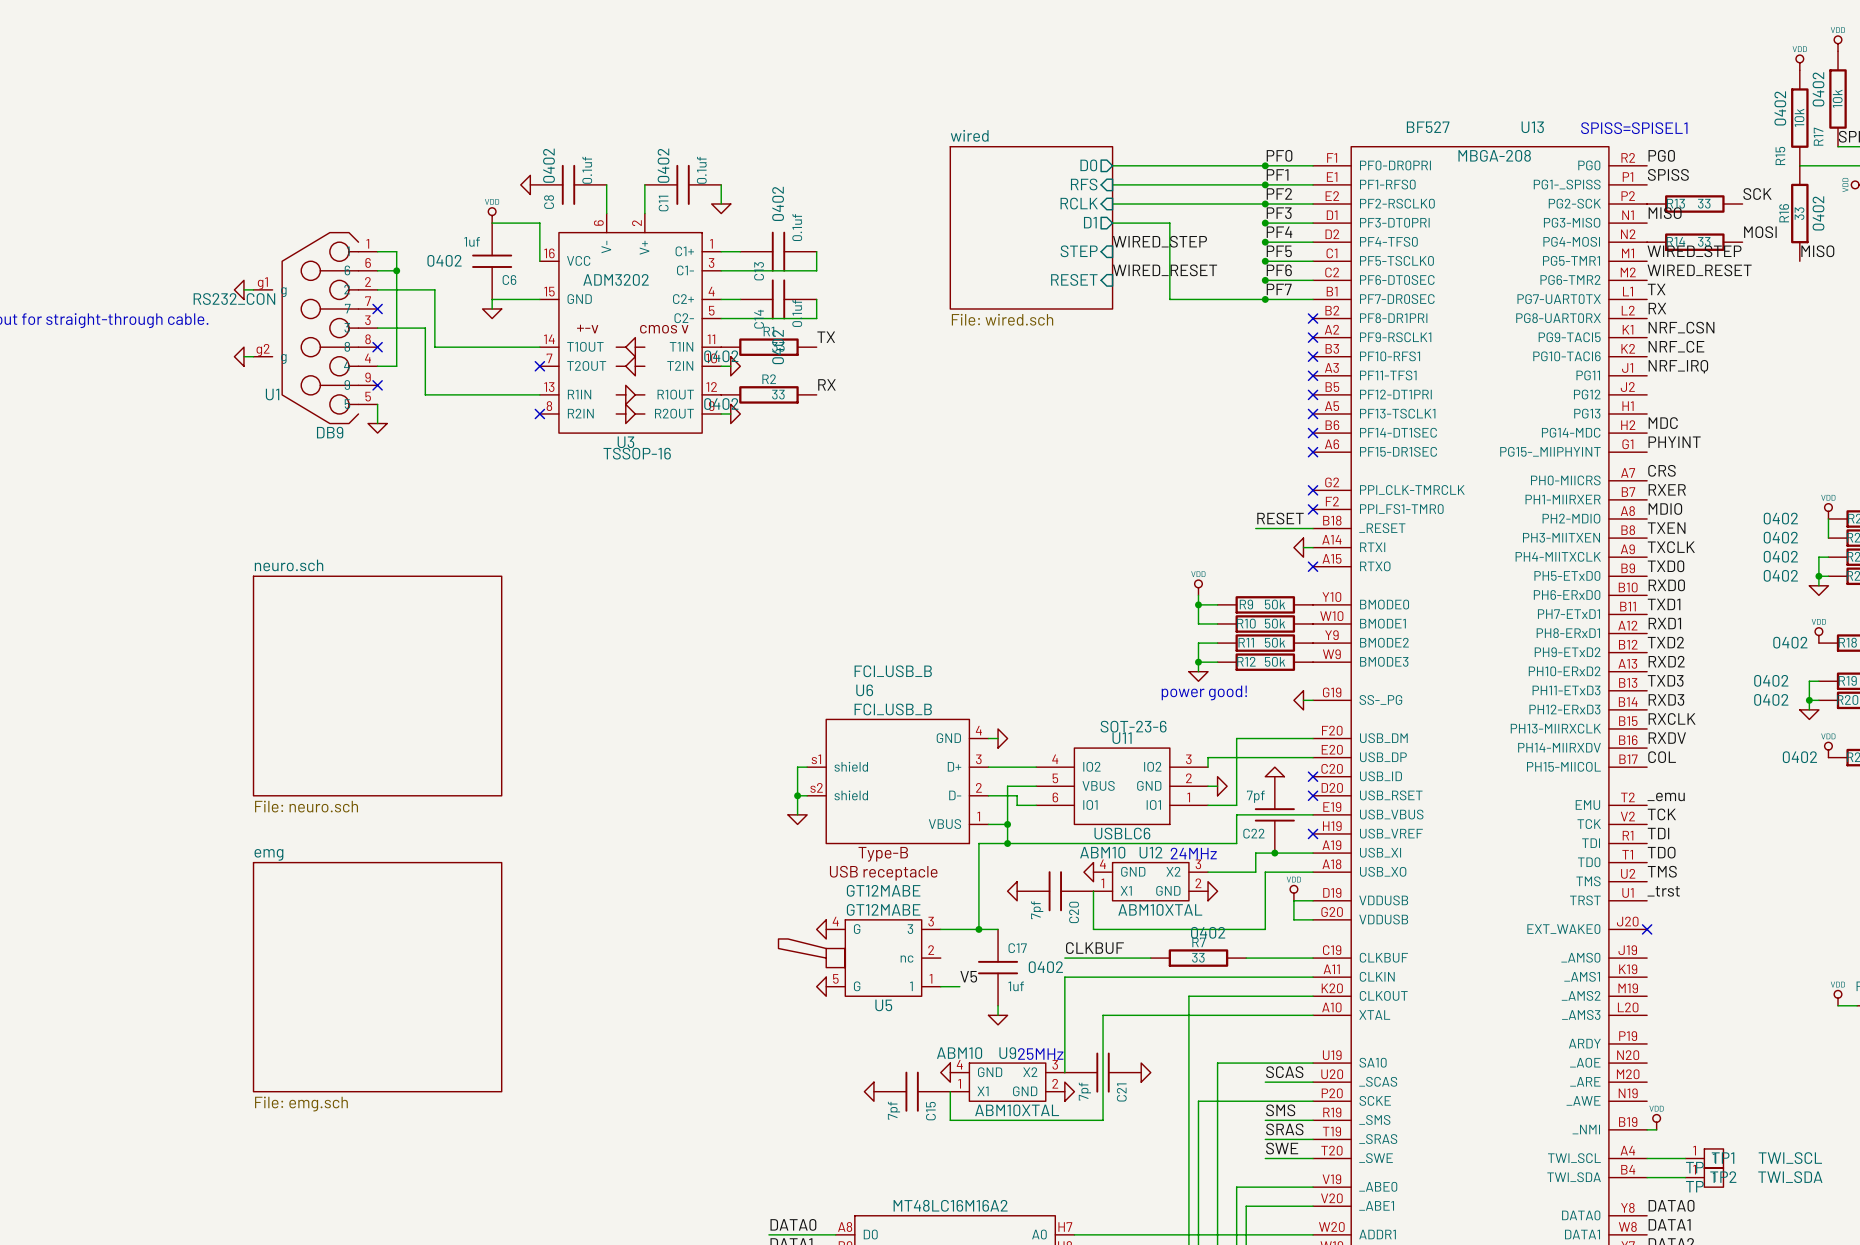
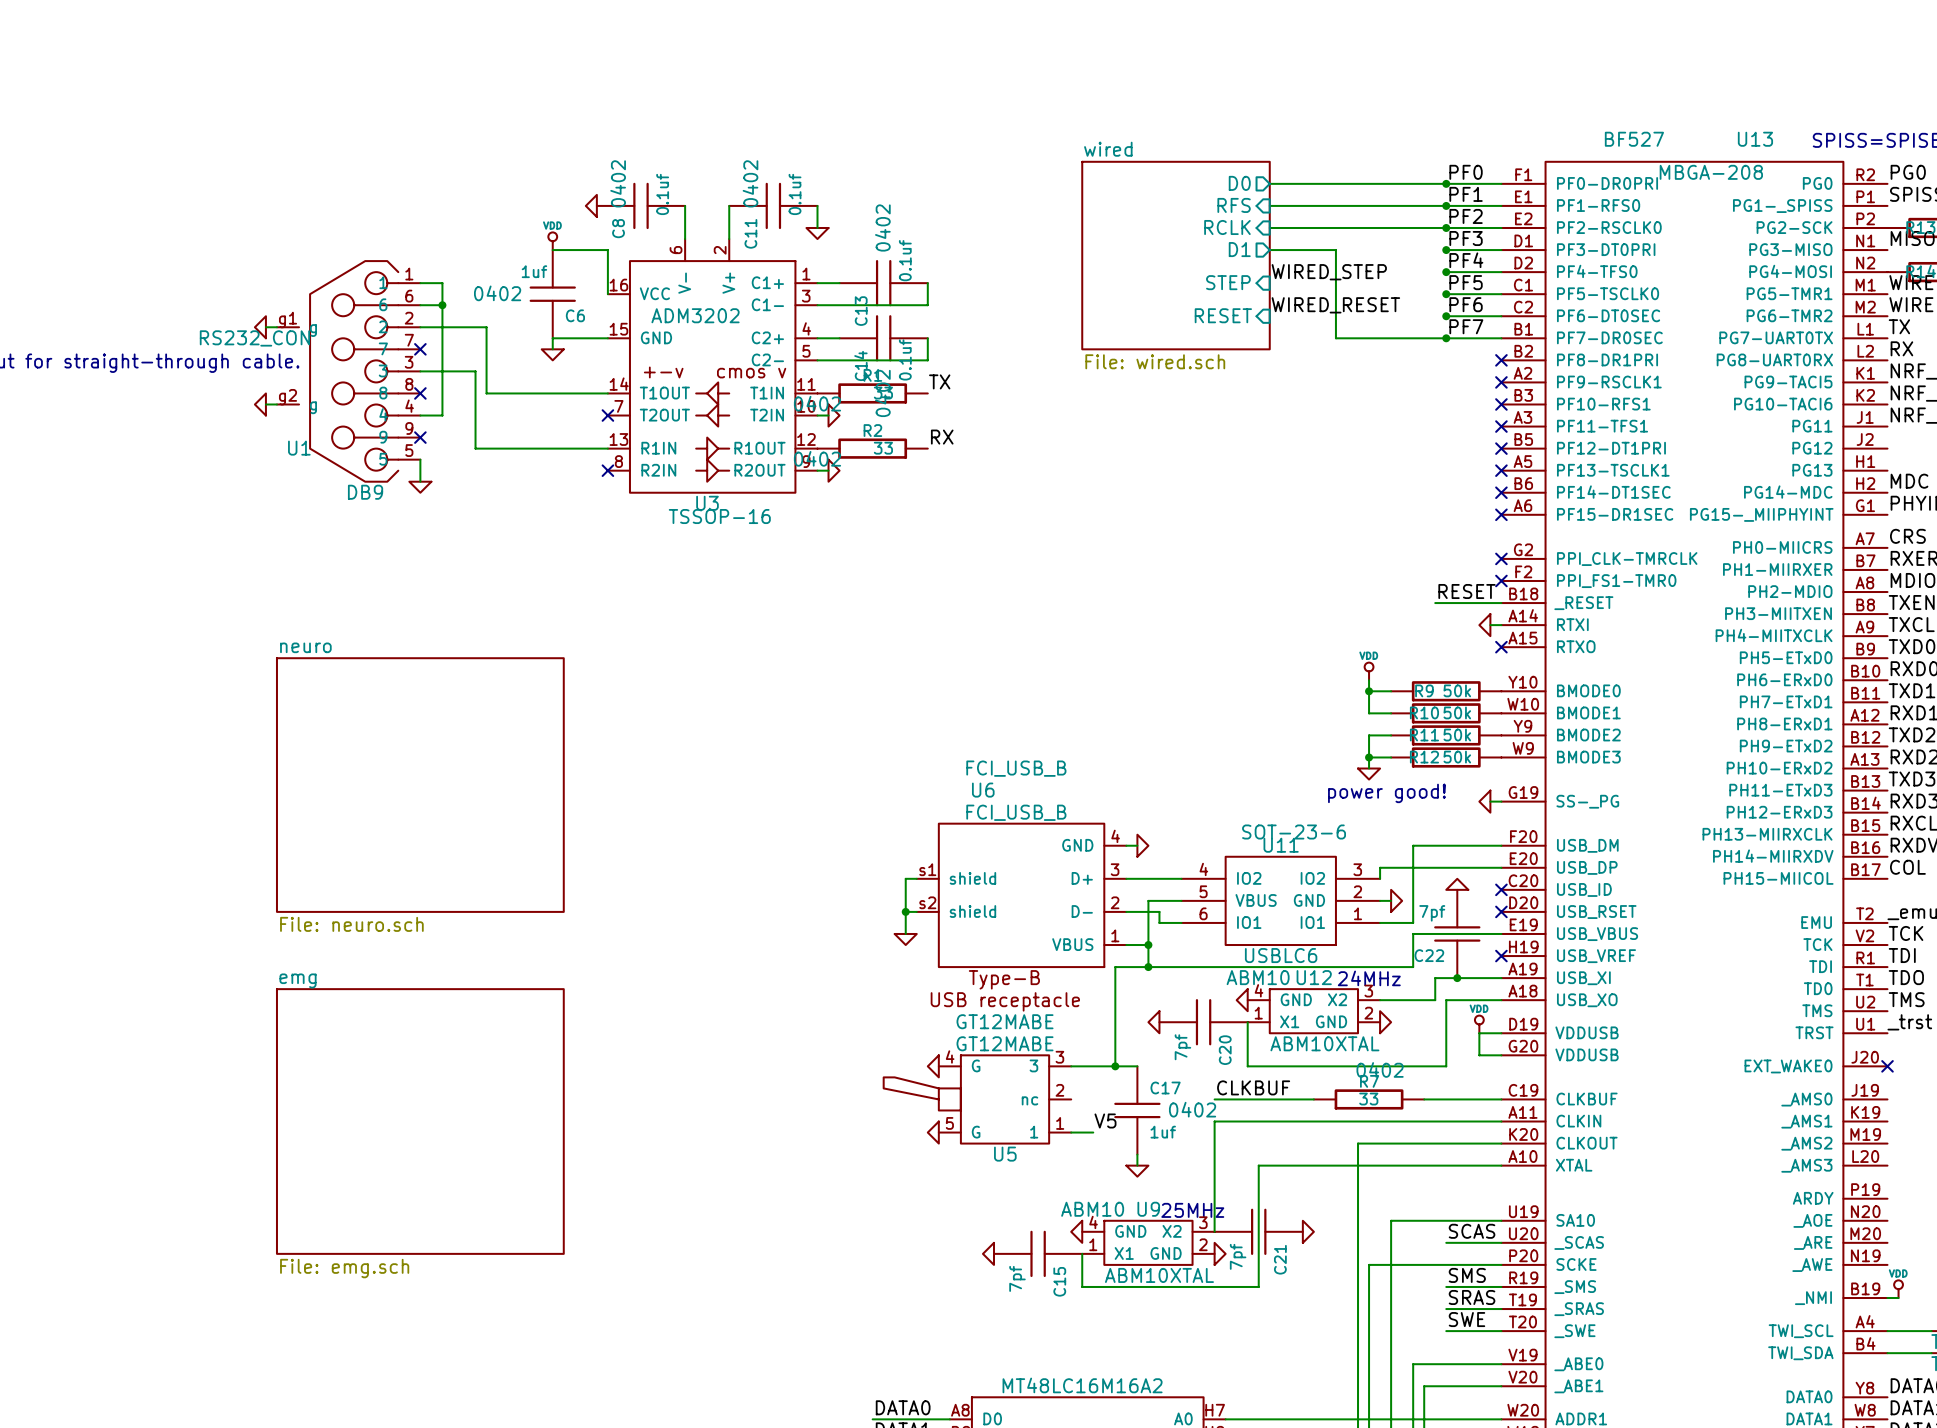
sheet neuro.sch name: neuro.sch (289, 565) -> neuro (305, 647)

